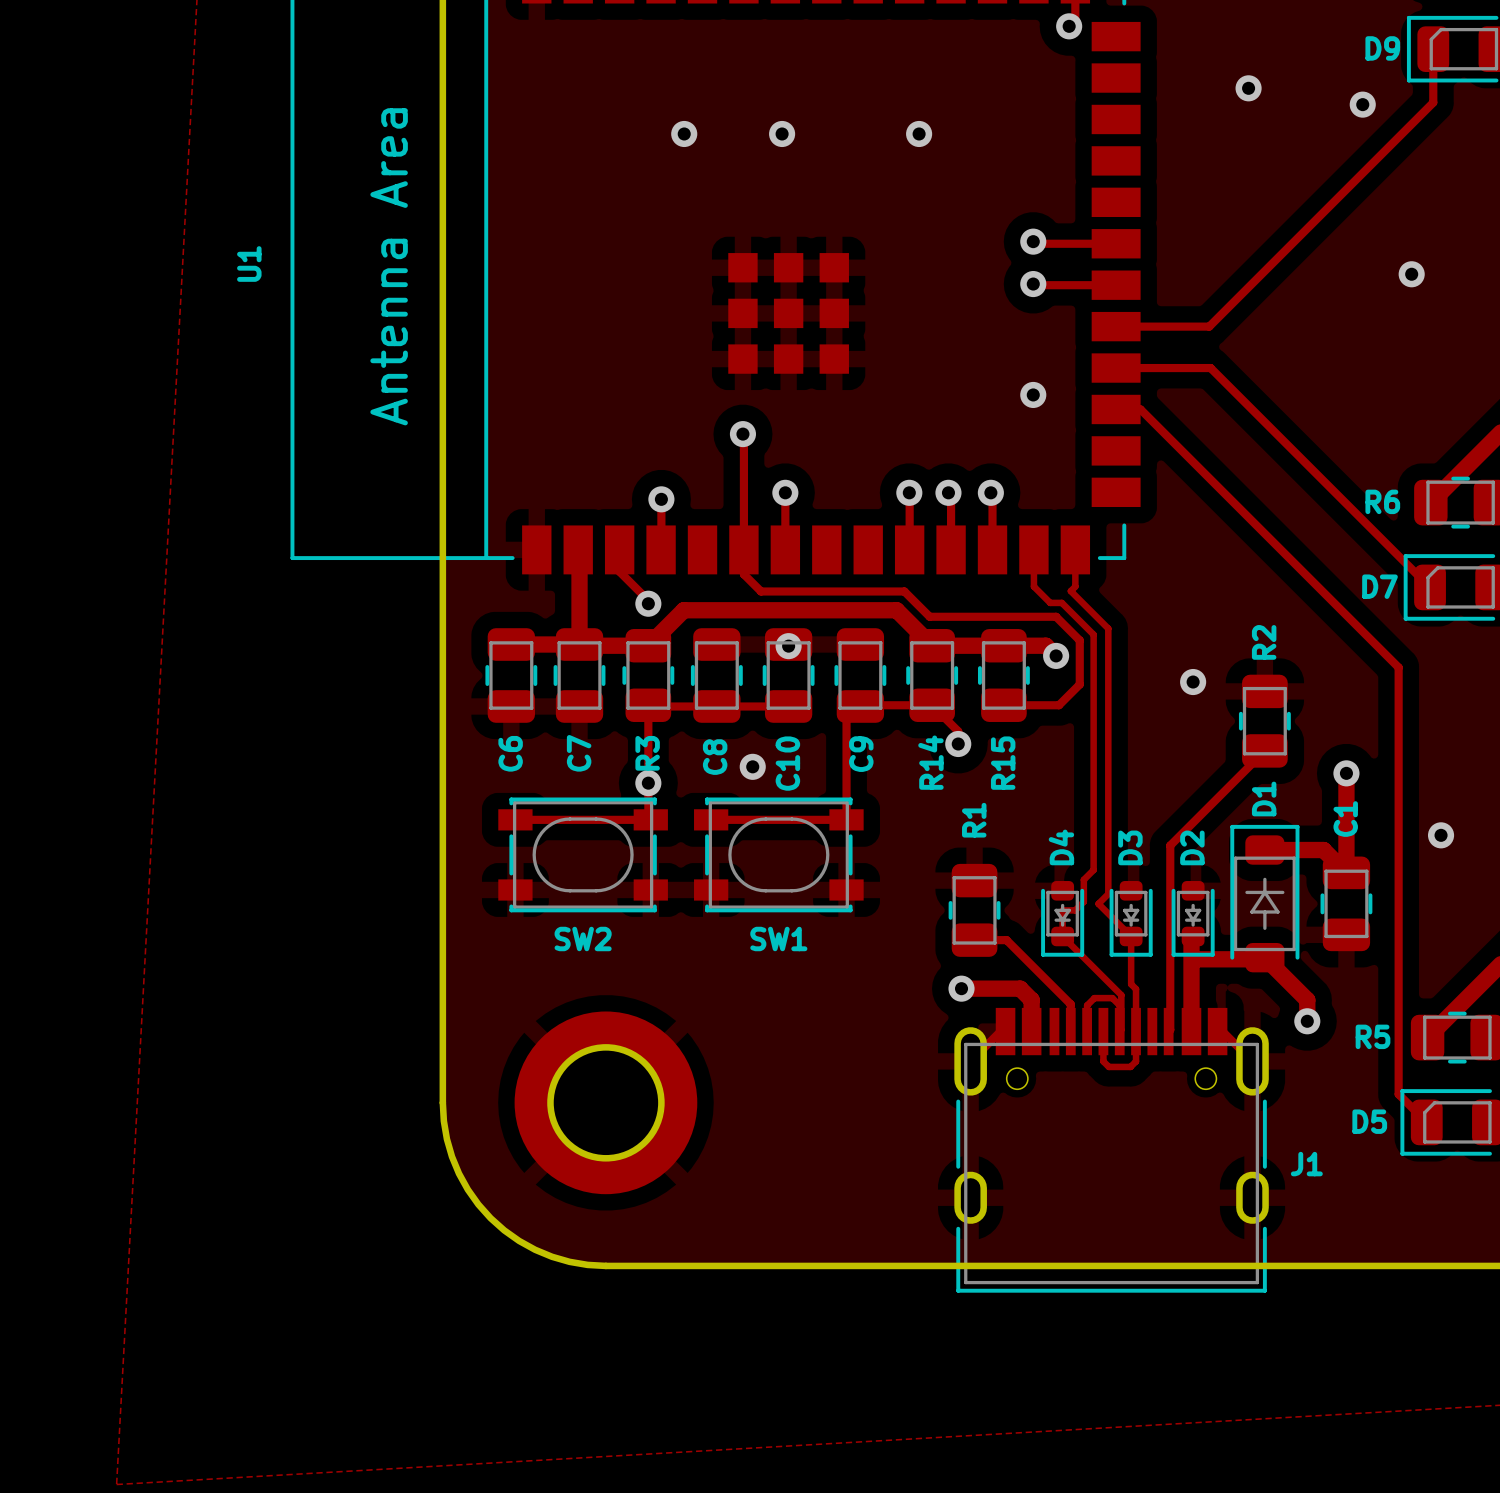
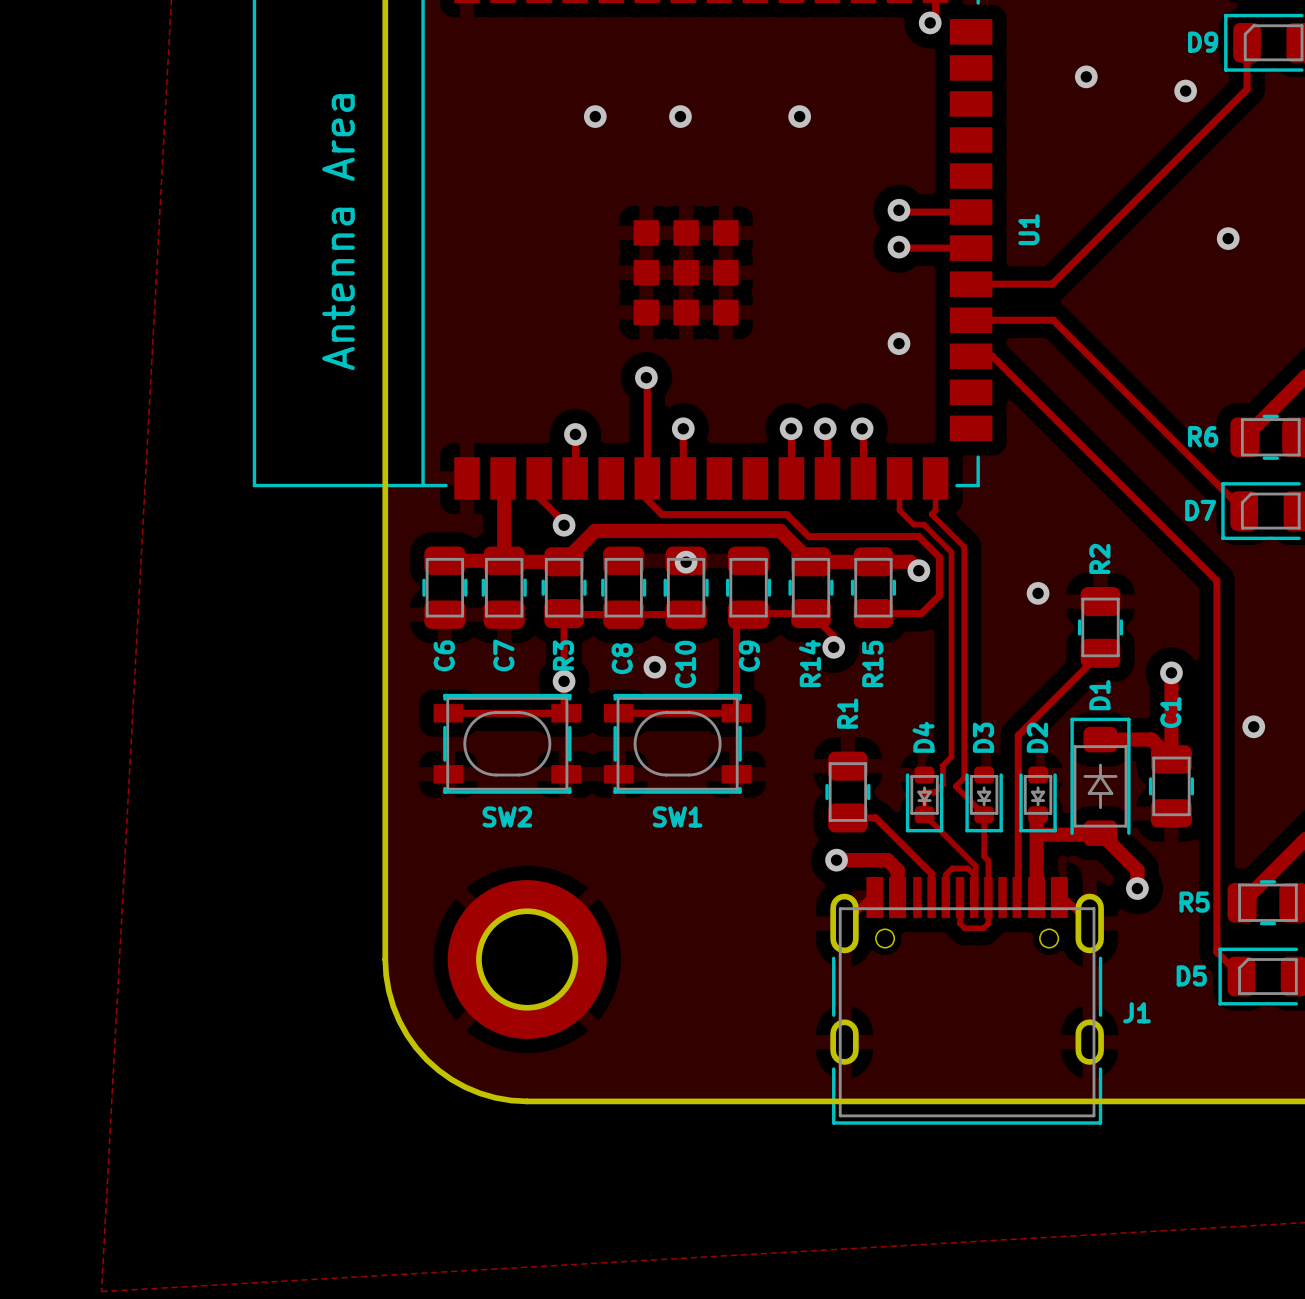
U1 name position: U1 (249, 264) -> U1 (1028, 229)

